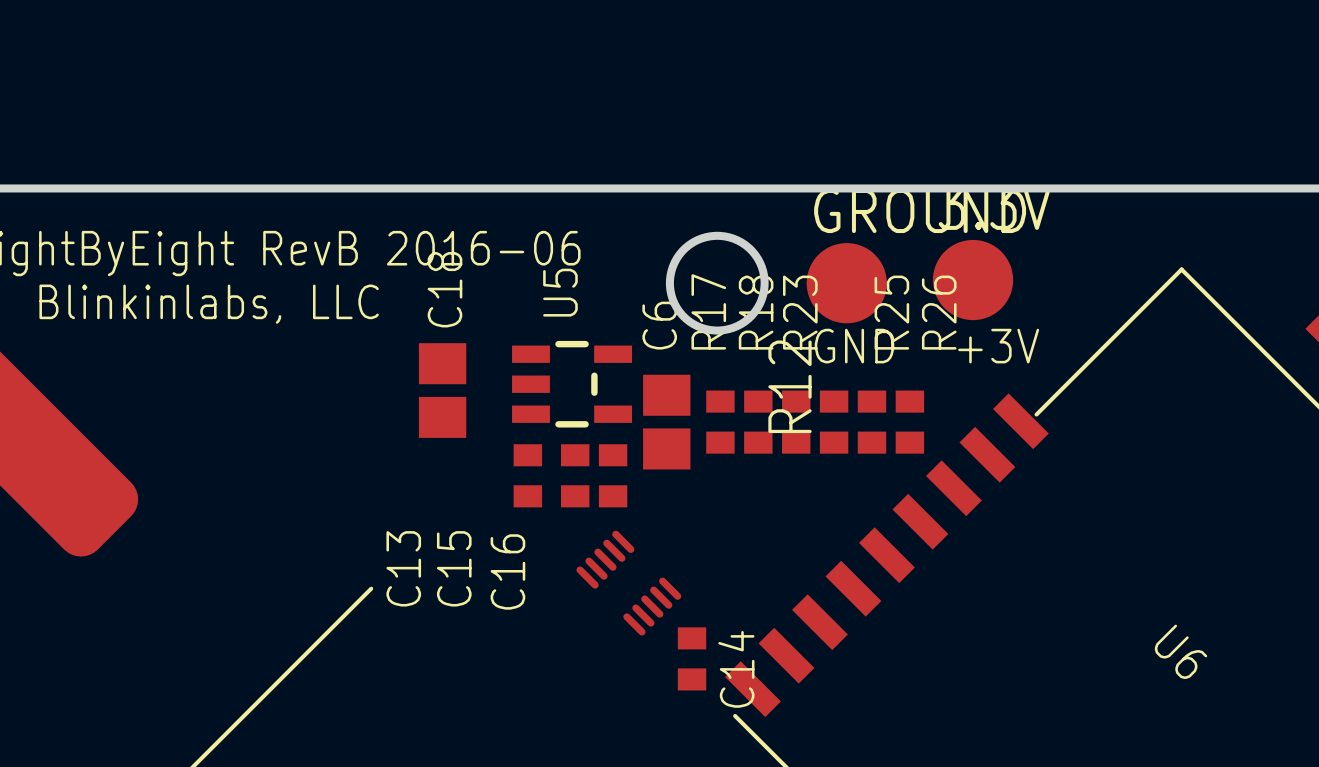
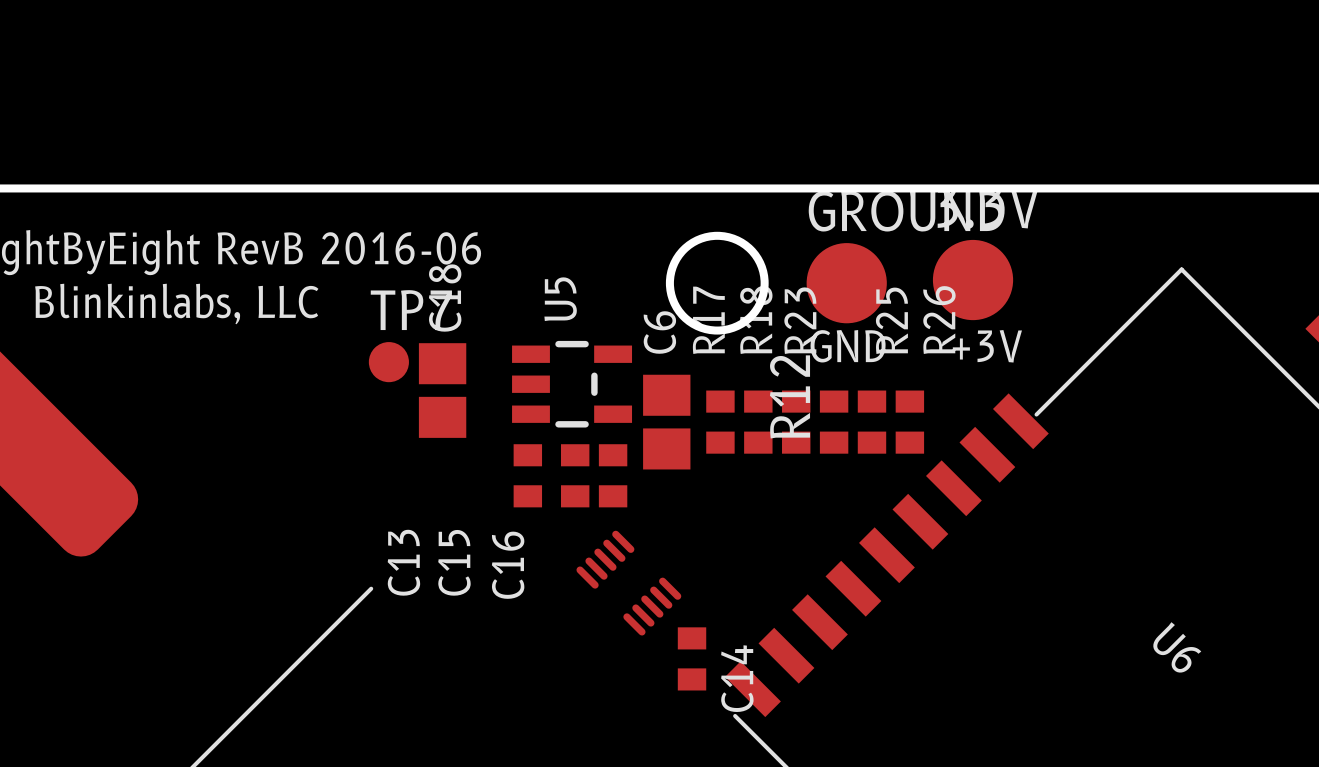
TP7: none -> (388, 362)

